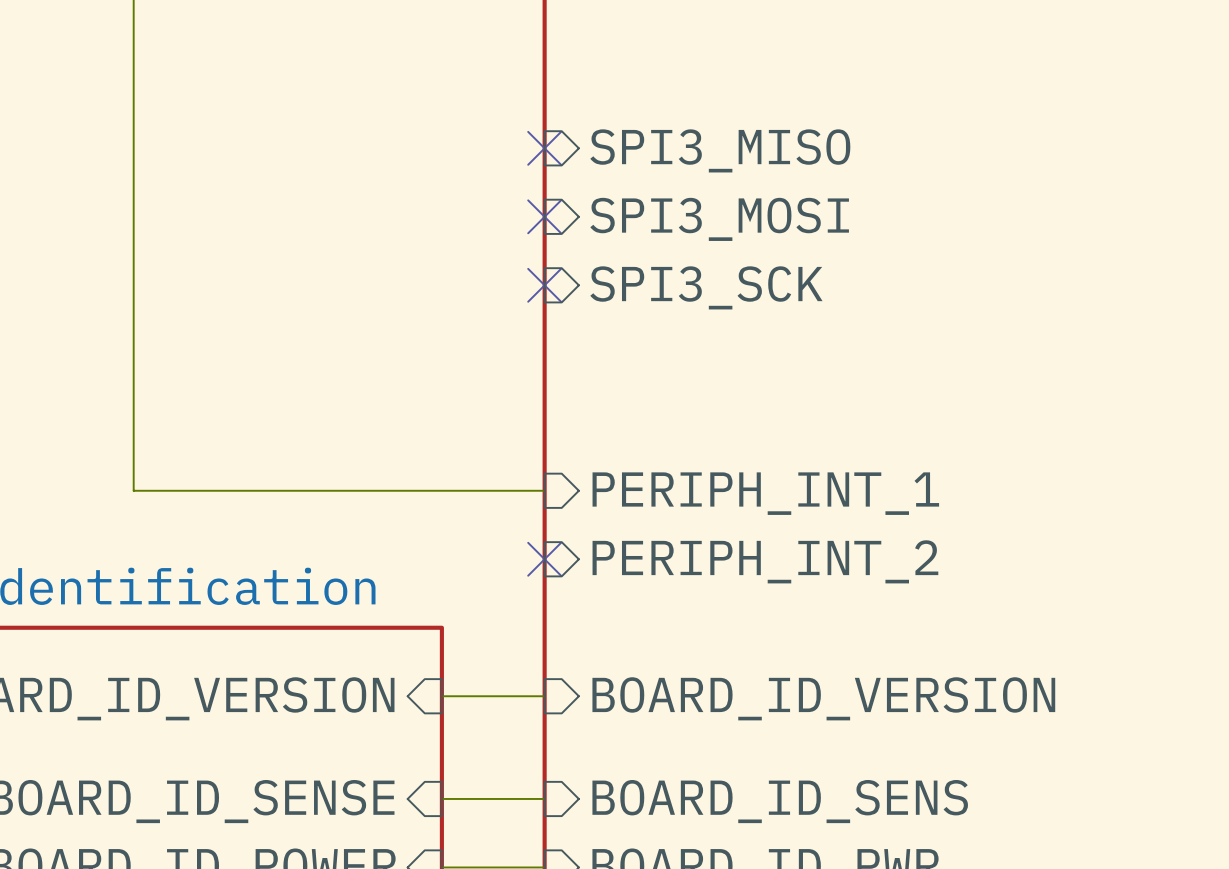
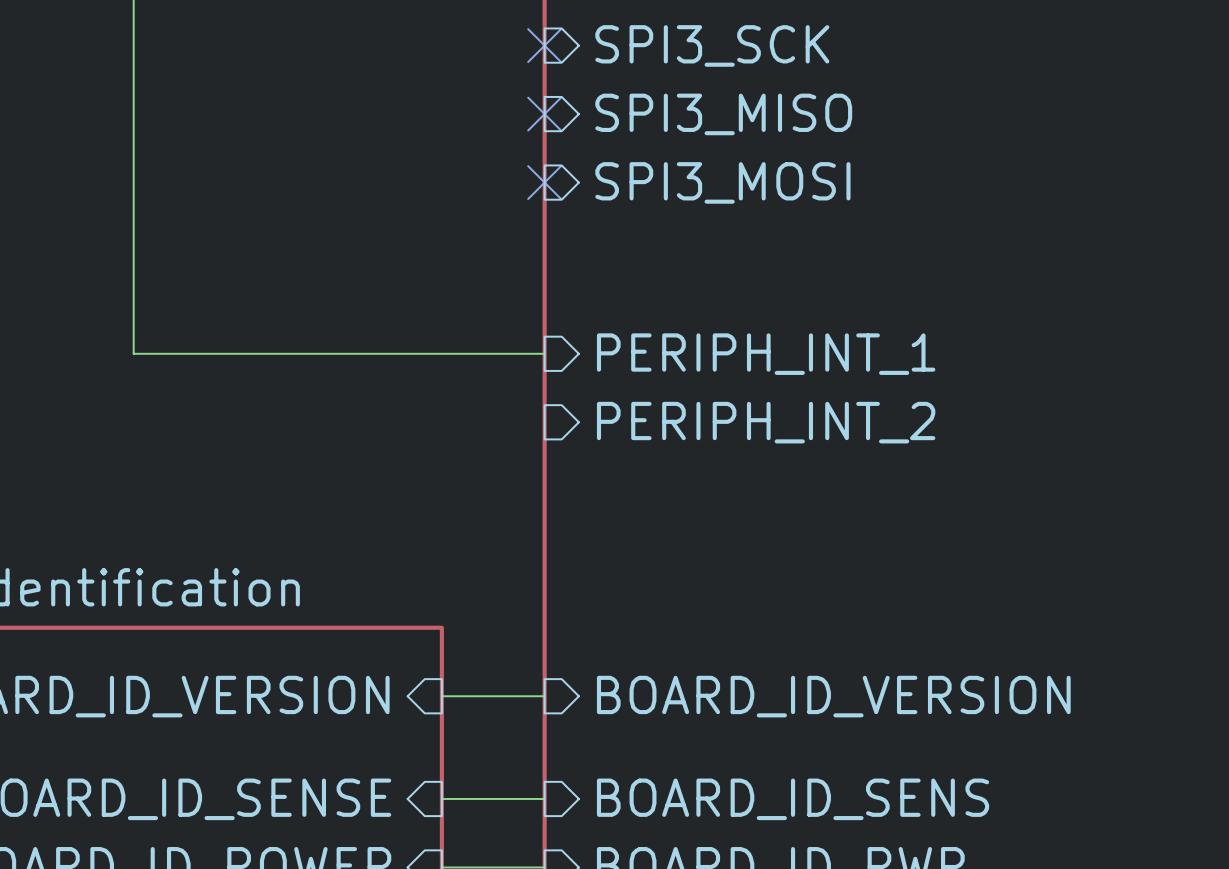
no-connect mark: none -> (544, 45)
no-connect mark: none -> (544, 114)
no-connect mark: (544, 148) -> none
sheet pin position: SPI3_MISO (720, 150) -> SPI3_MISO (723, 114)
no-connect mark: none -> (544, 182)
no-connect mark: (544, 216) -> none
sheet pin position: SPI3_MOSI (719, 219) -> SPI3_MOSI (722, 182)
no-connect mark: (544, 285) -> none
sheet pin position: SPI3_SCK (706, 287) -> SPI3_SCK (712, 45)
wire: (133, 353) (133, 490) (544, 490) -> (133, 353) (544, 353)
sheet pin position: PERIPH_INT_1 (765, 493) -> PERIPH_INT_1 (766, 354)
no-connect mark: (544, 559) -> none
sheet pin position: PERIPH_INT_2 (765, 561) -> PERIPH_INT_2 (766, 422)

